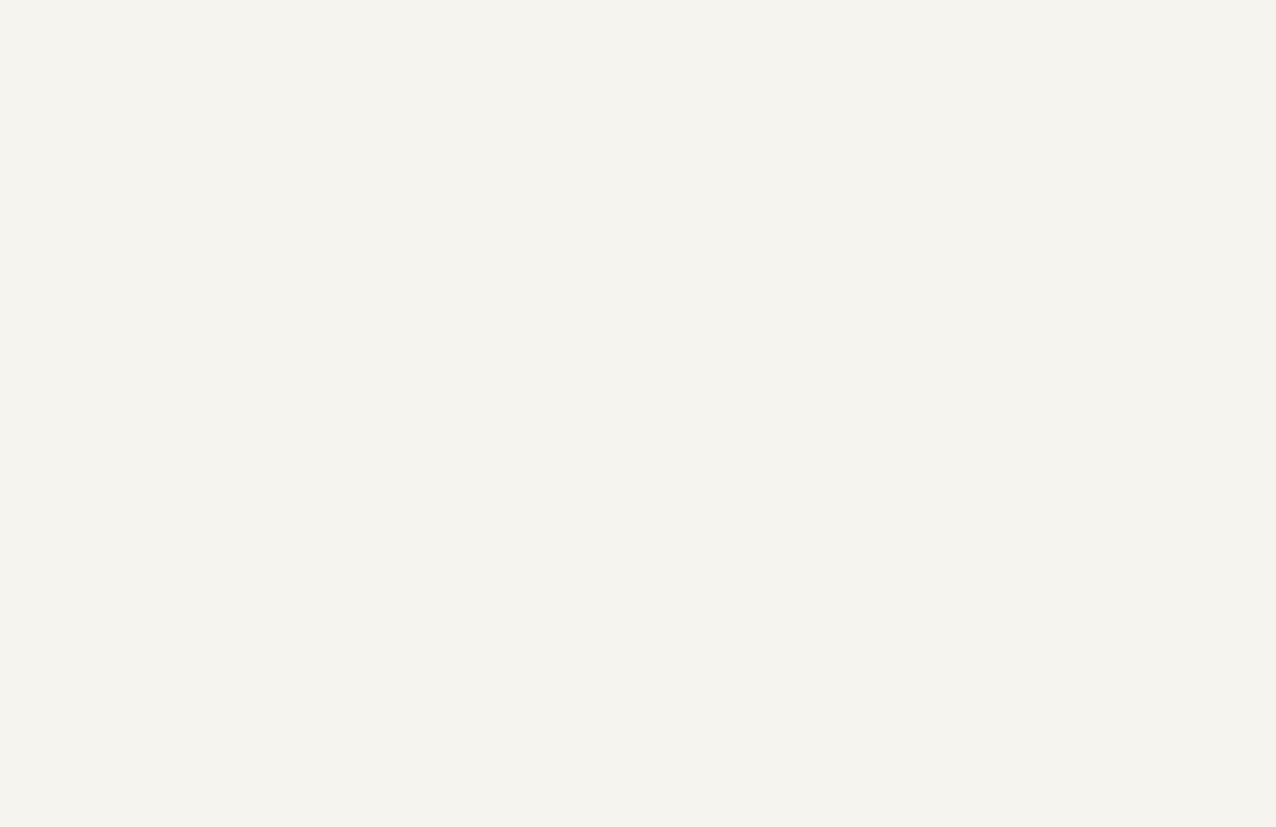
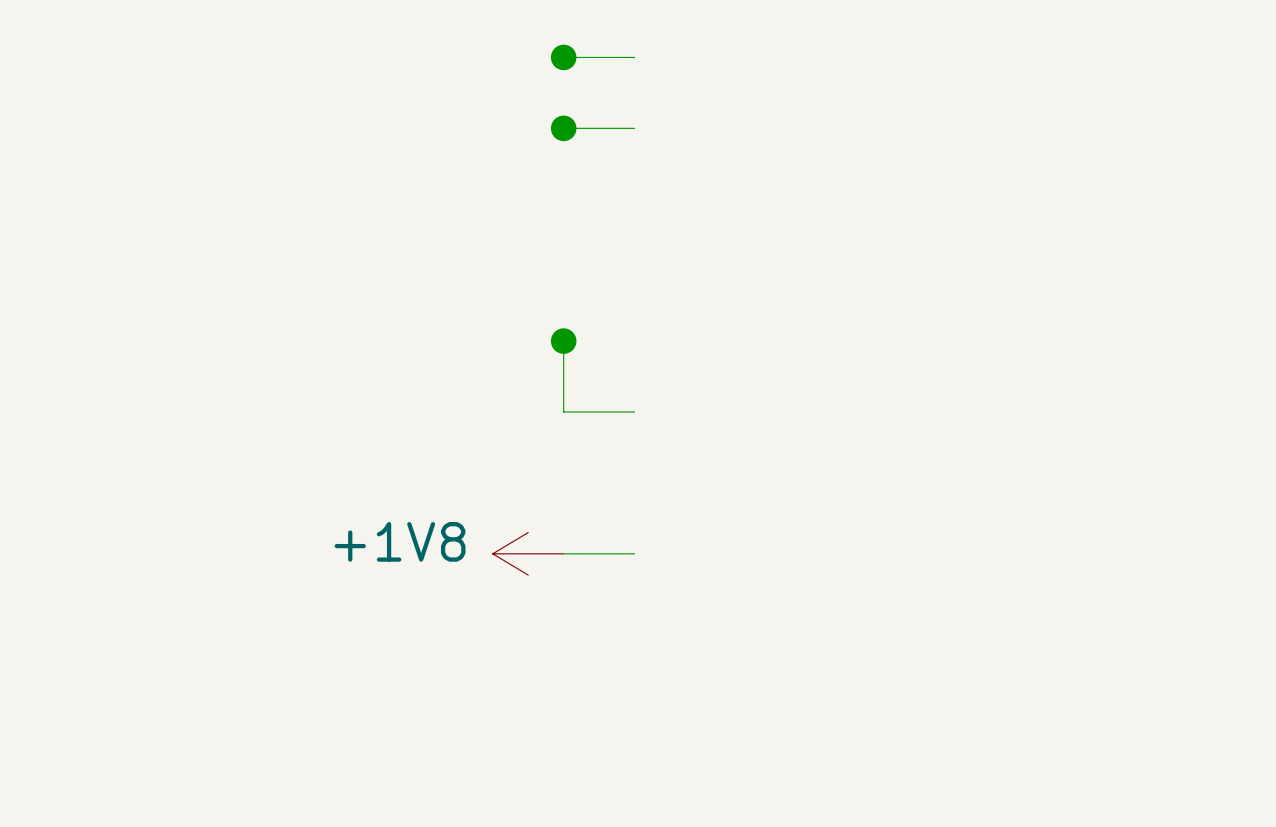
wire: none -> (563, 57) (634, 57)
junction: none -> (563, 57)
wire: none -> (563, 128) (634, 128)
junction: none -> (563, 128)
wire: none -> (563, 341) (563, 412) (634, 412)
junction: none -> (563, 341)
power symbol: none -> +1V8 (528, 553)
wire: none -> (563, 553) (634, 553)

